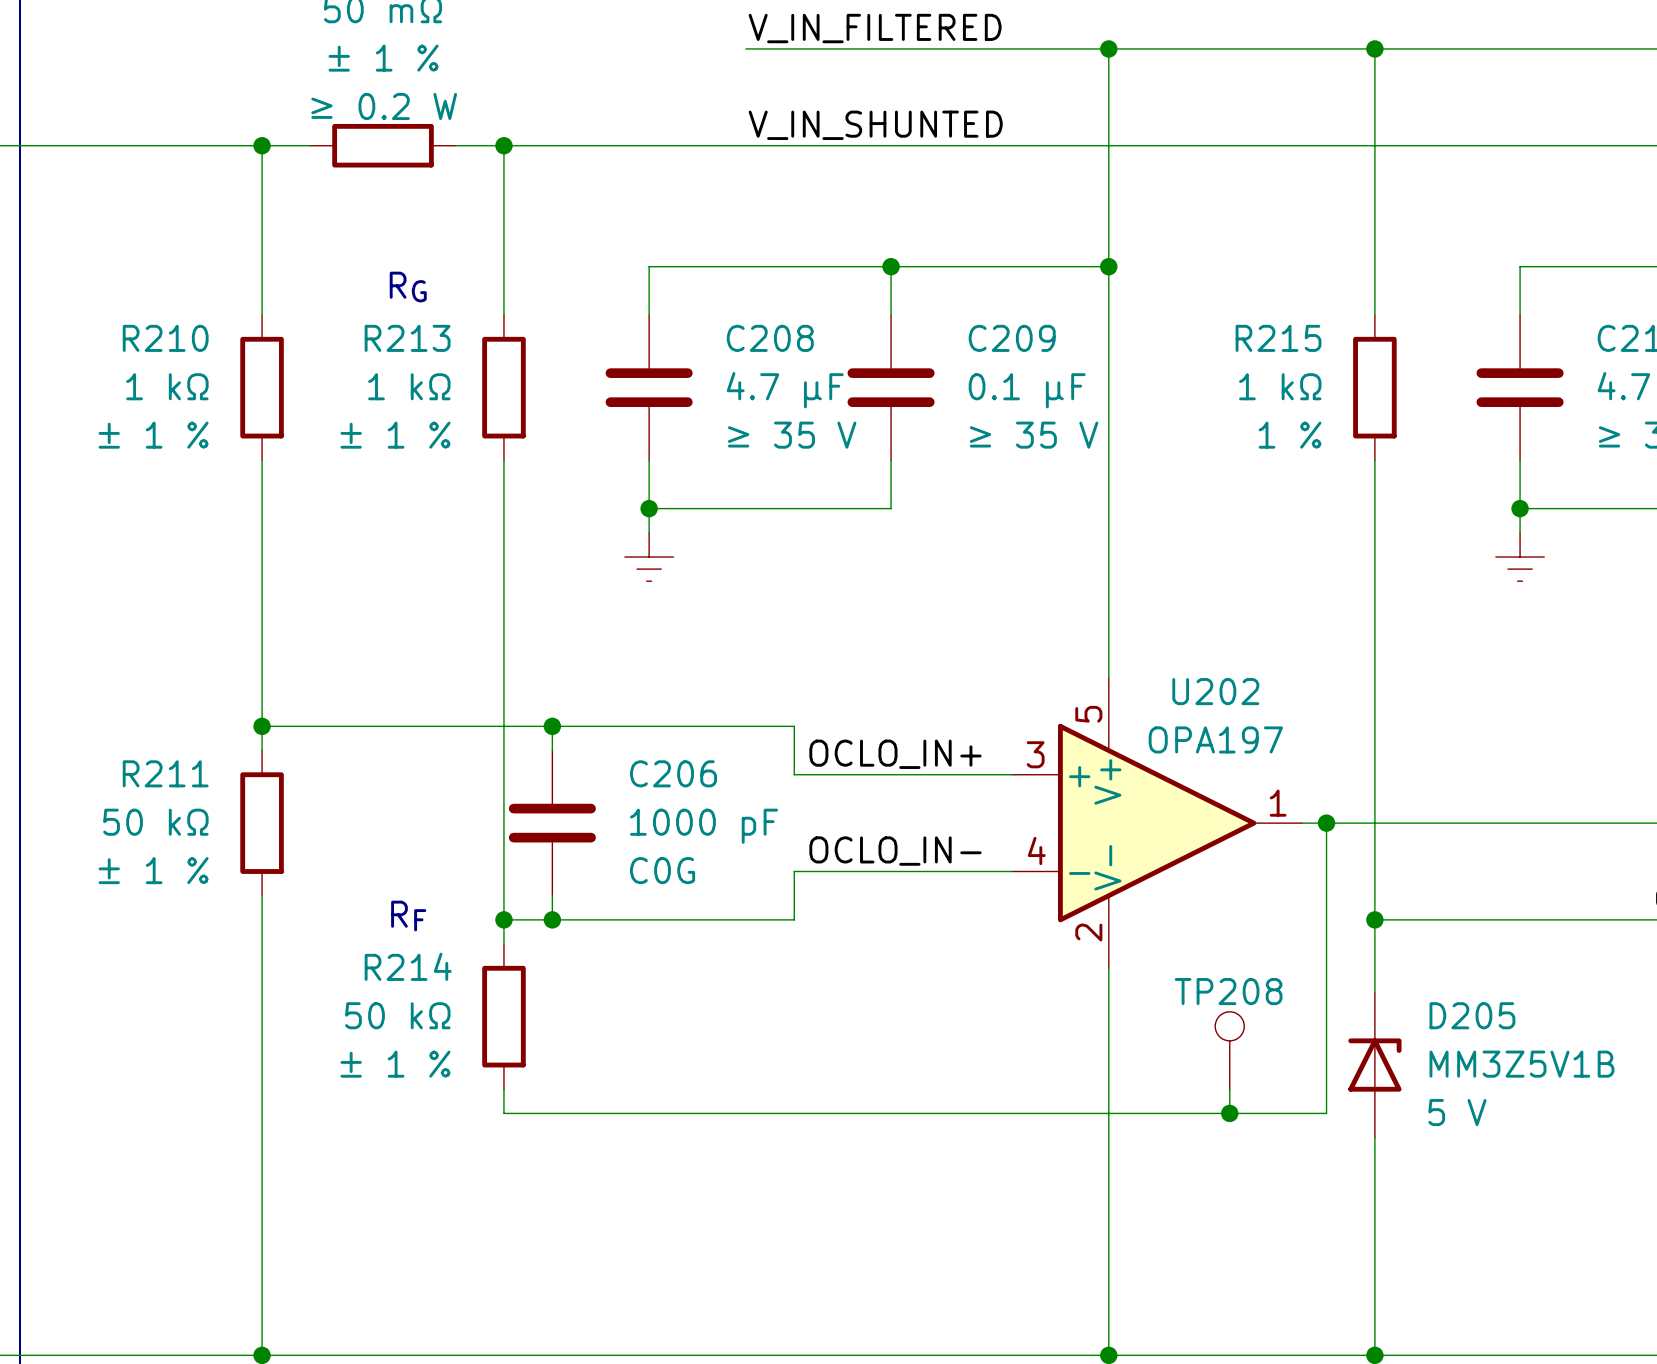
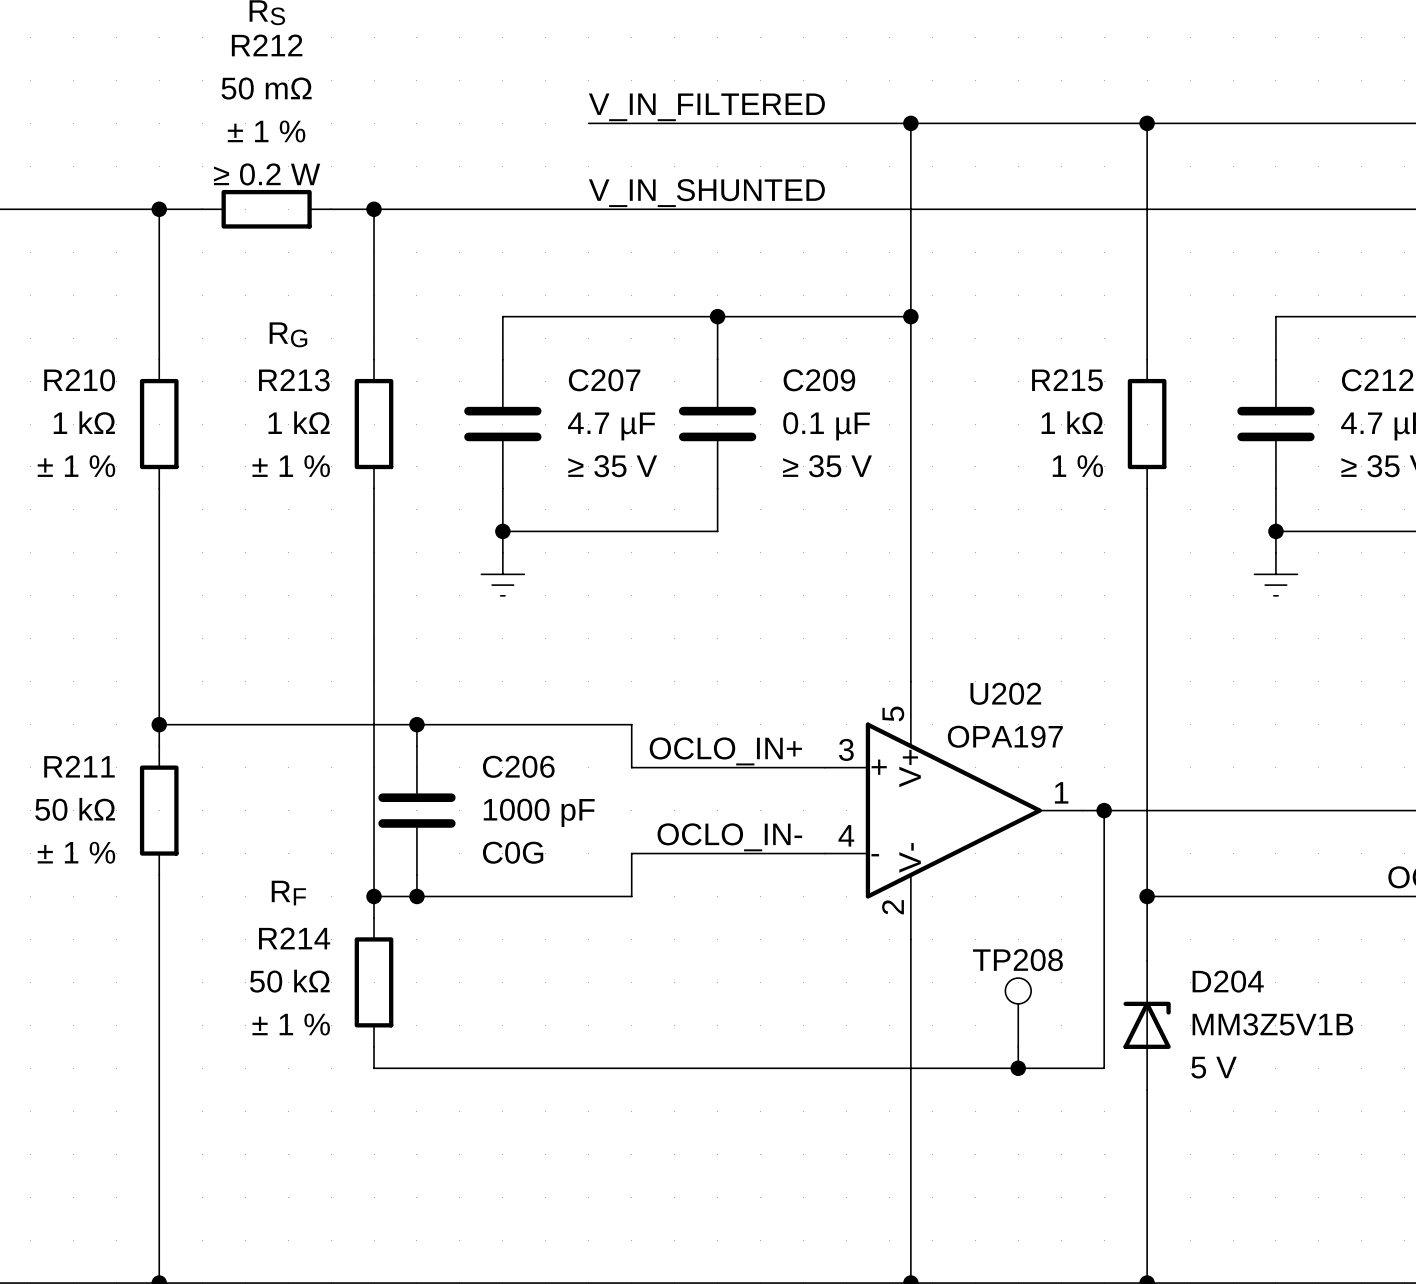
C208 name: C208 (770, 338) -> C207 (604, 380)
D205 name: D205 (1472, 1015) -> D204 (1228, 981)

